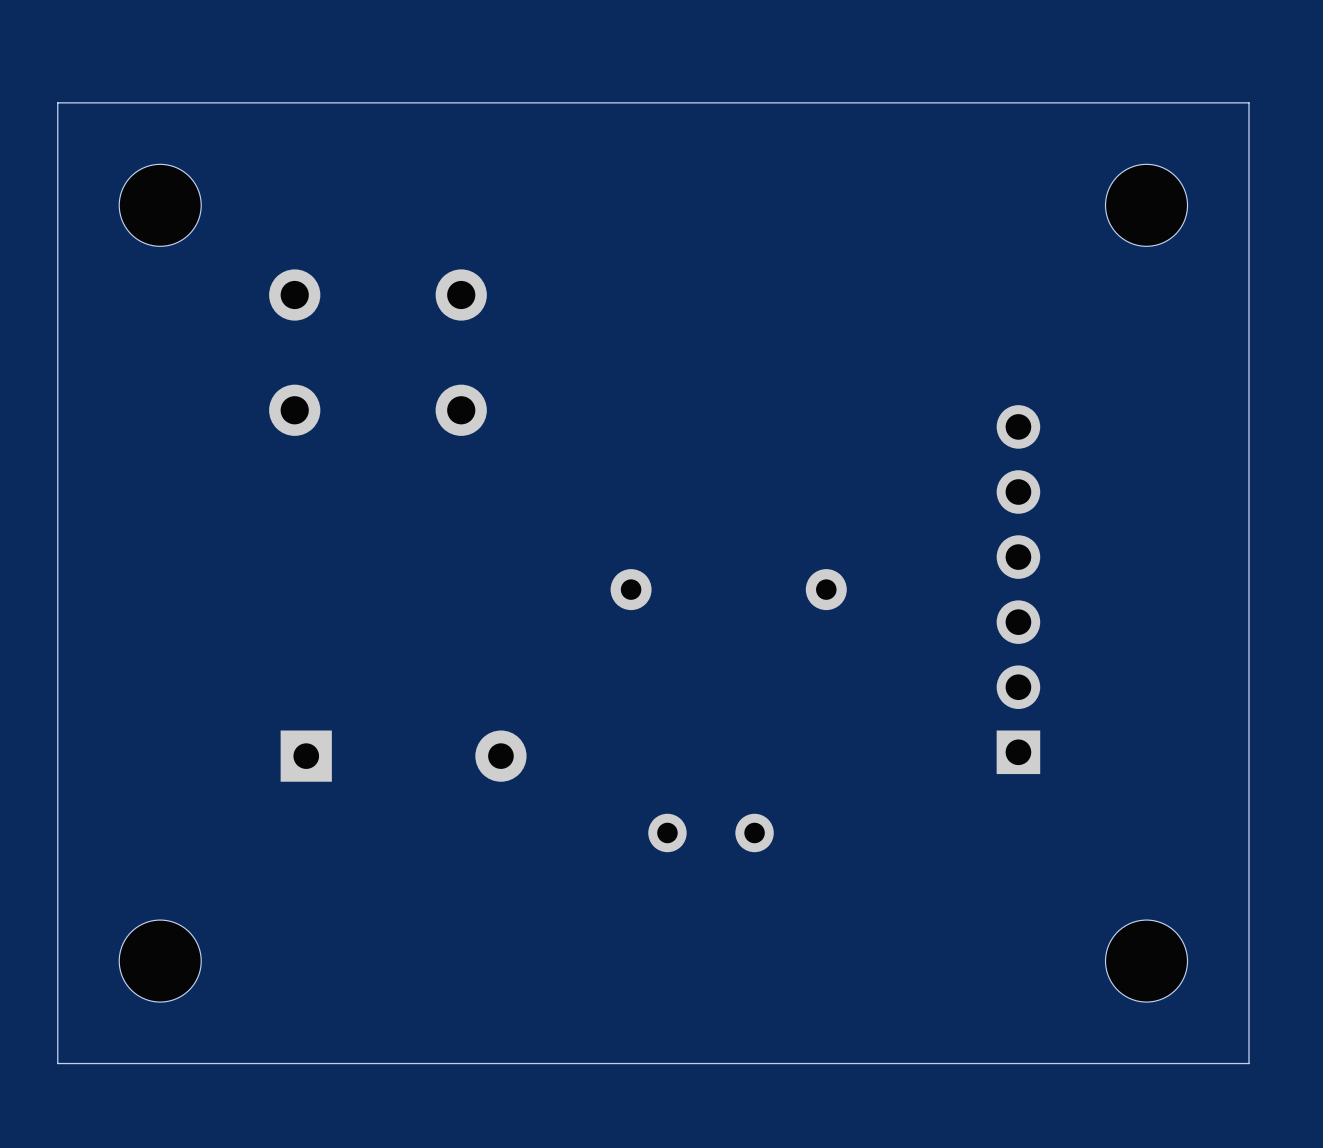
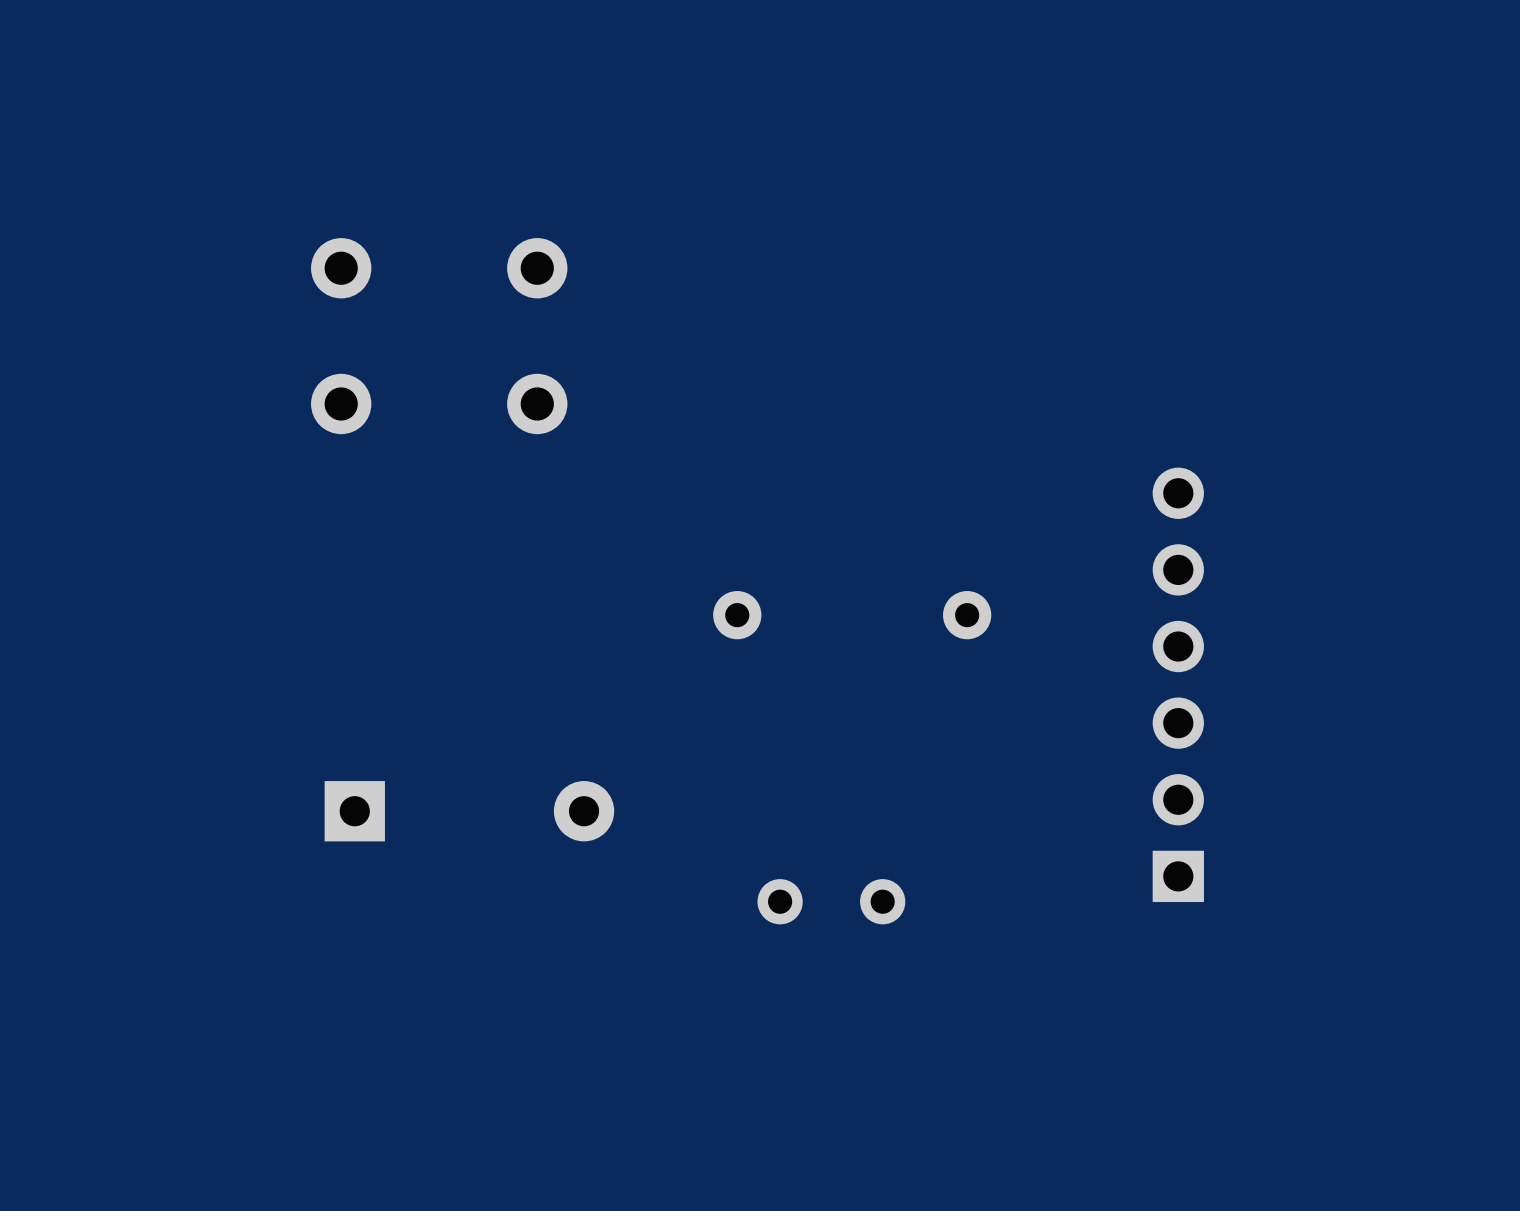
board edge: (1248, 102) (57, 102) (57, 1063) (1248, 1063) (1248, 102) -> none
part: (160, 205) -> none
part: (1146, 205) -> none
part position: (1018, 589) -> (1178, 684)
part: (160, 961) -> none
part: (1146, 961) -> none

